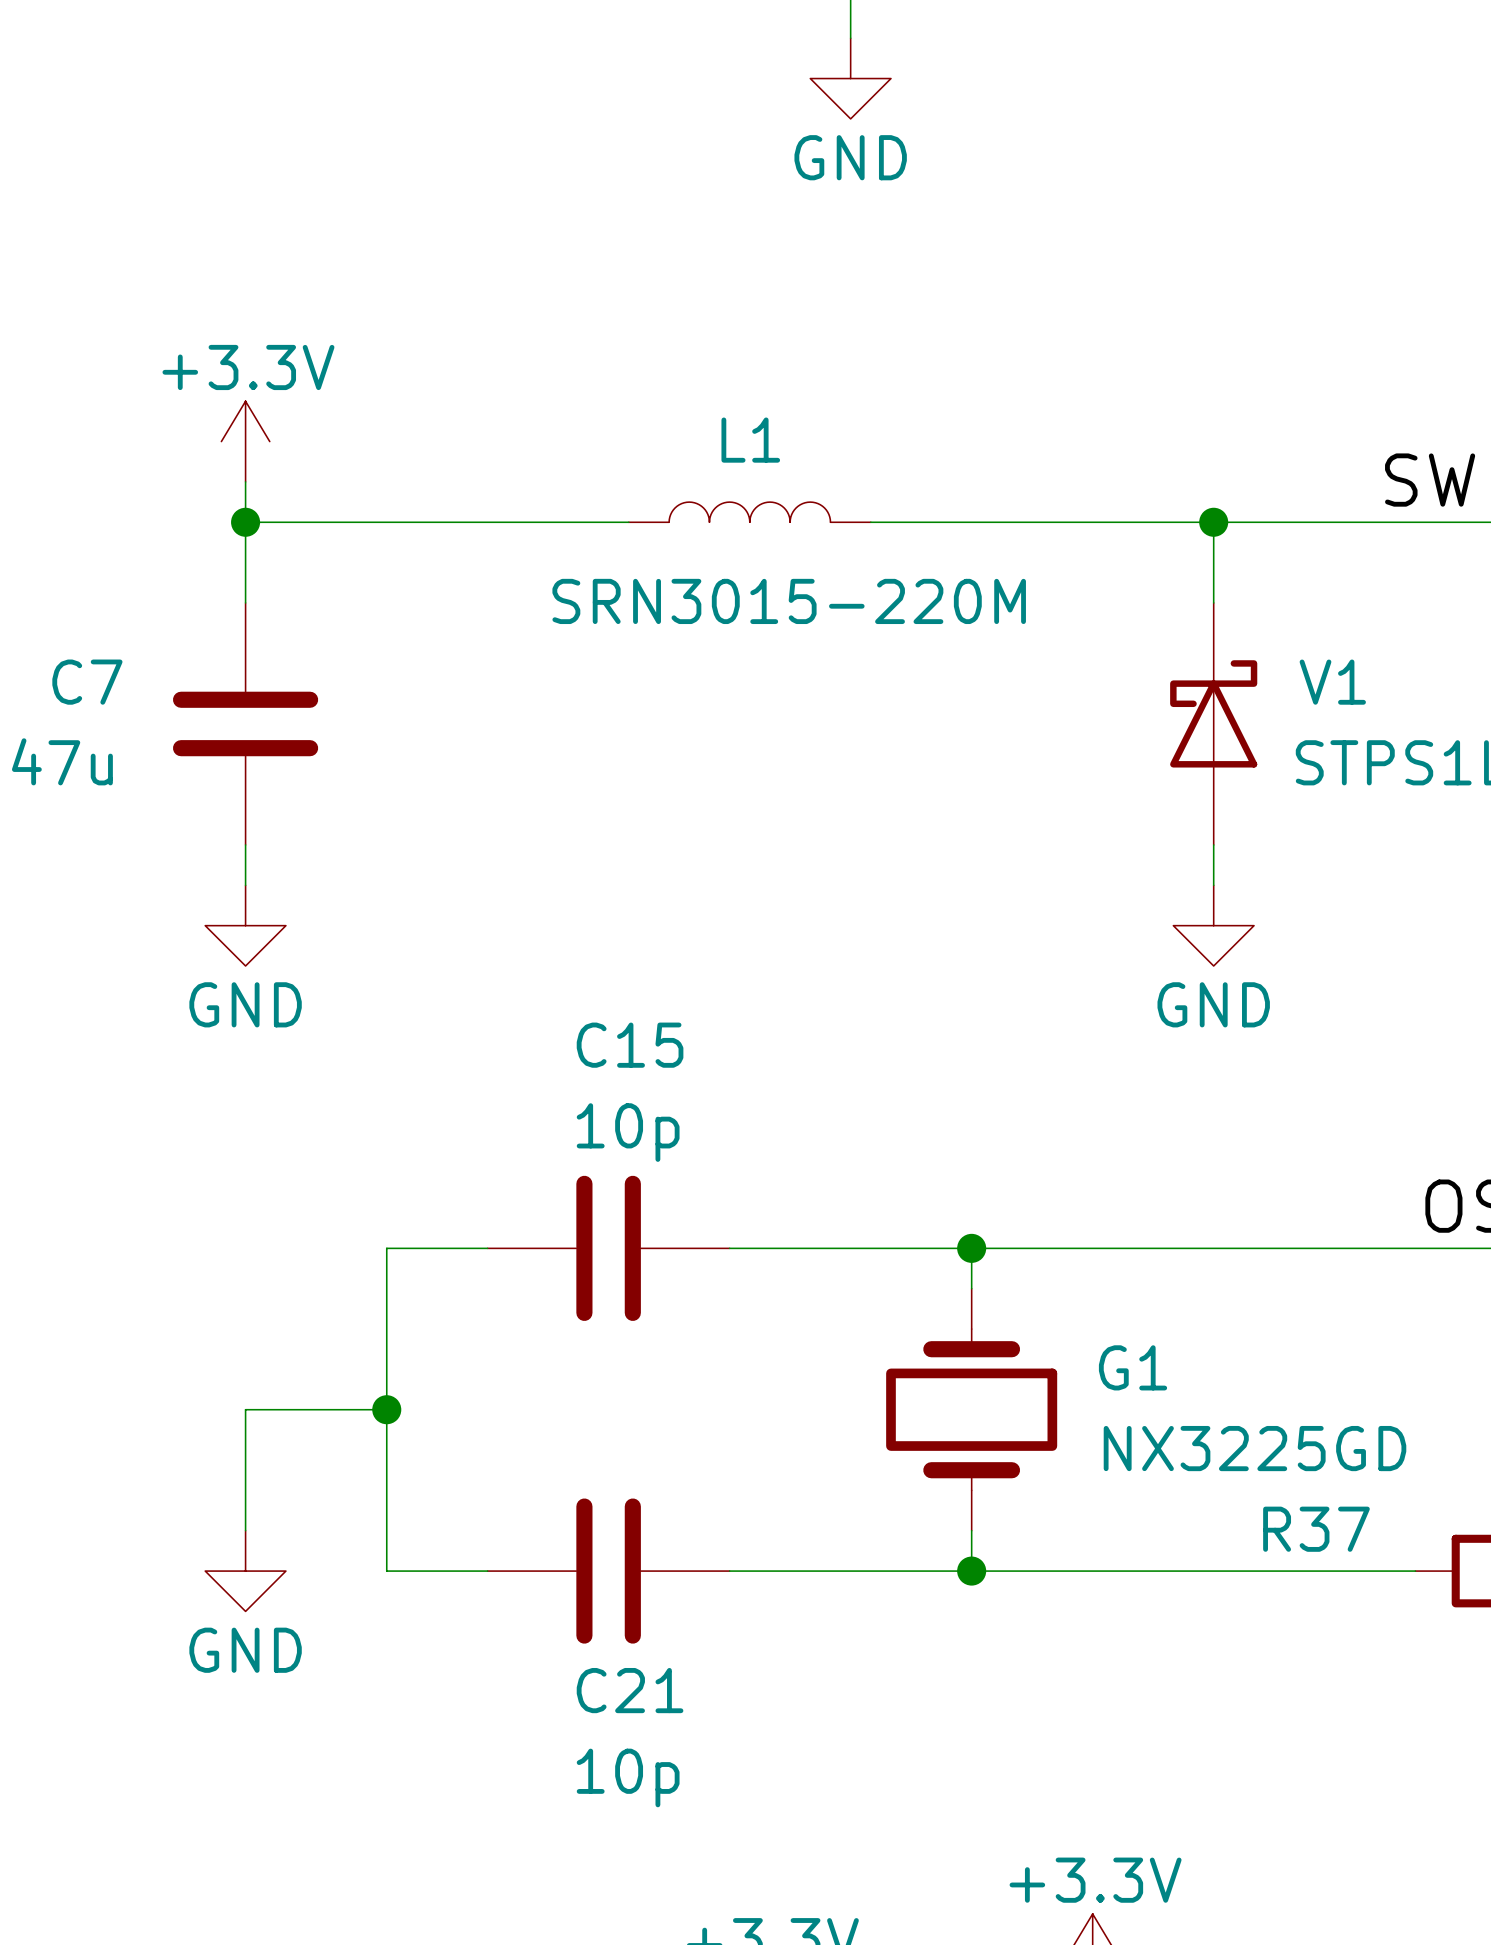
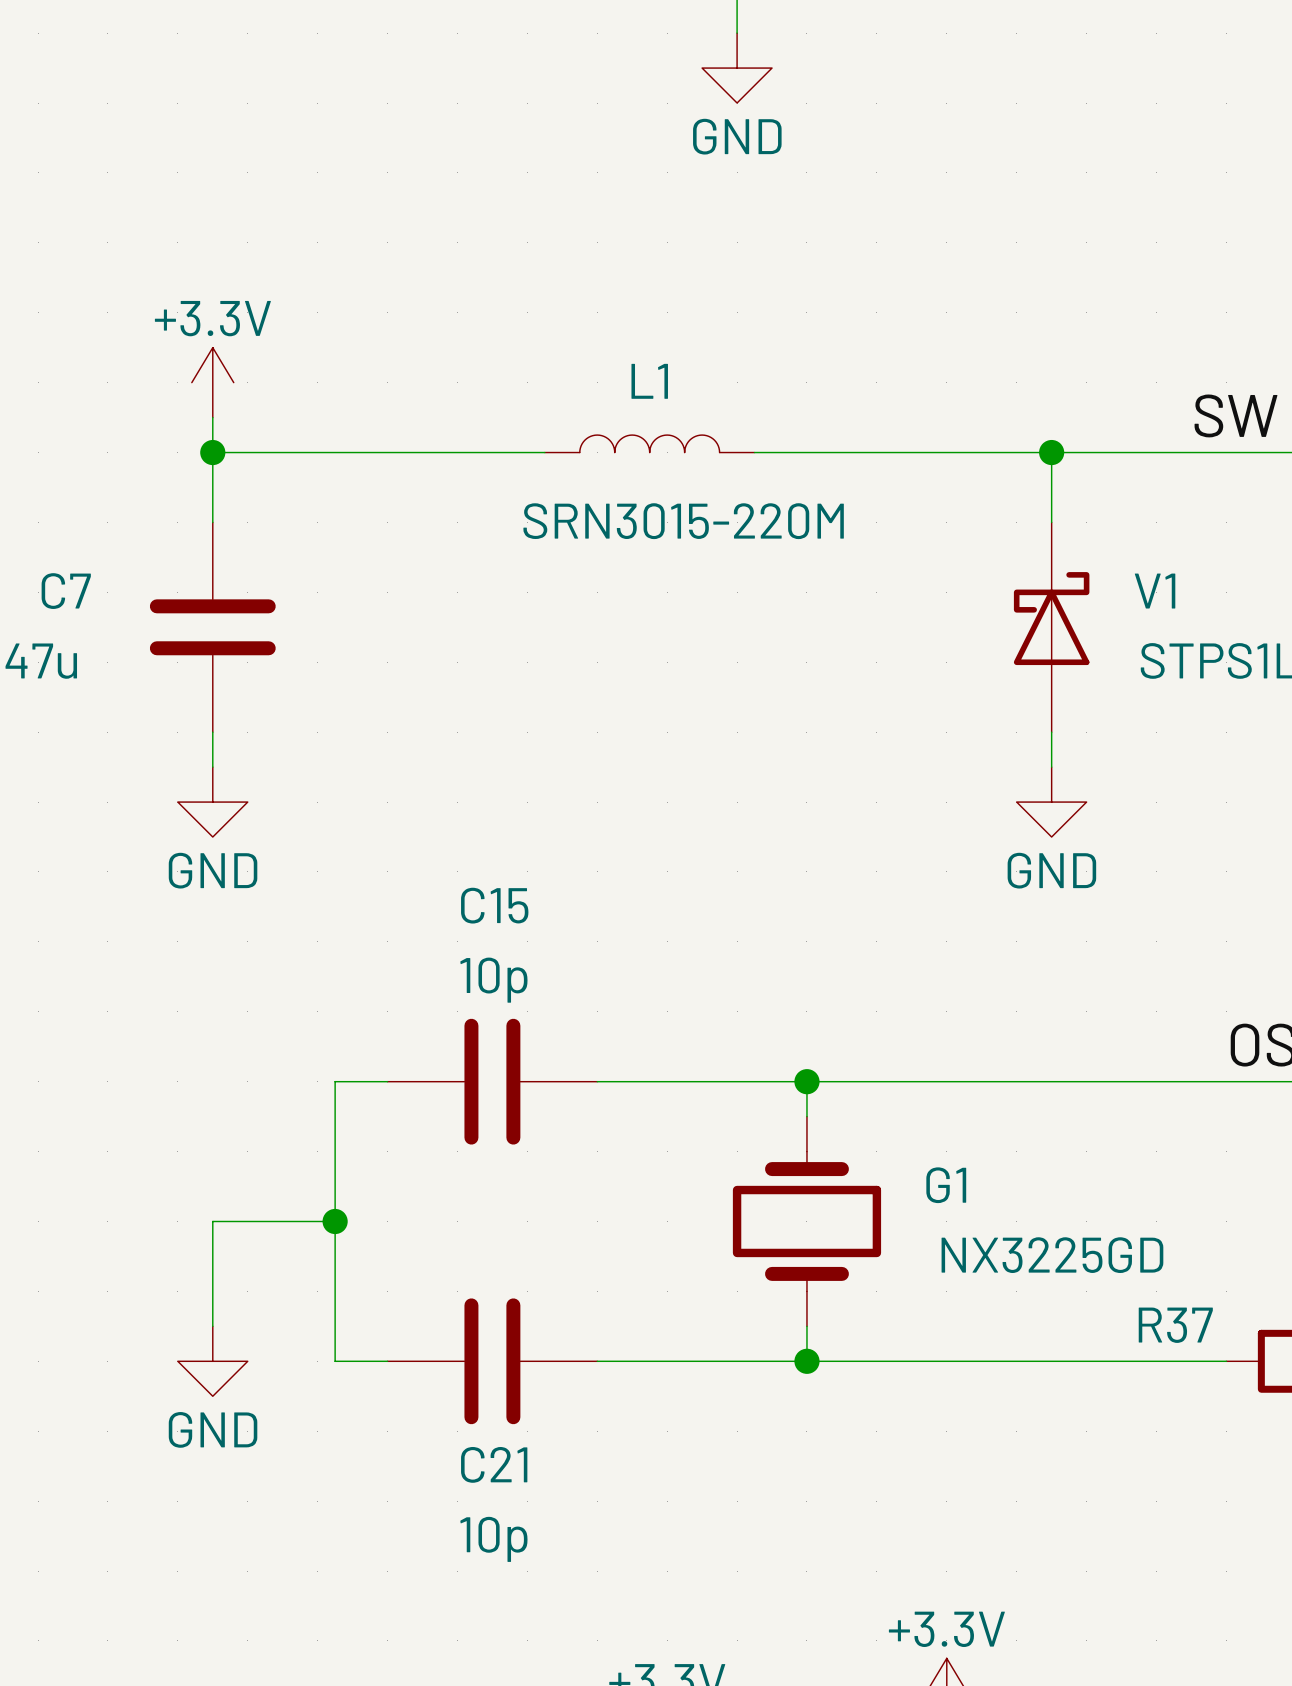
C15 position: (608, 1248) -> (492, 1081)
wire: (971, 1248) (971, 1288) -> (806, 1081) (806, 1116)
junction position: (971, 1248) -> (806, 1081)
G1 position: (971, 1409) -> (806, 1221)
R37 name position: R37 (1316, 1529) -> R37 (1175, 1325)
wire: (971, 1530) (971, 1571) -> (806, 1326) (806, 1361)
C21 position: (608, 1571) -> (492, 1361)
junction position: (971, 1571) -> (806, 1361)

